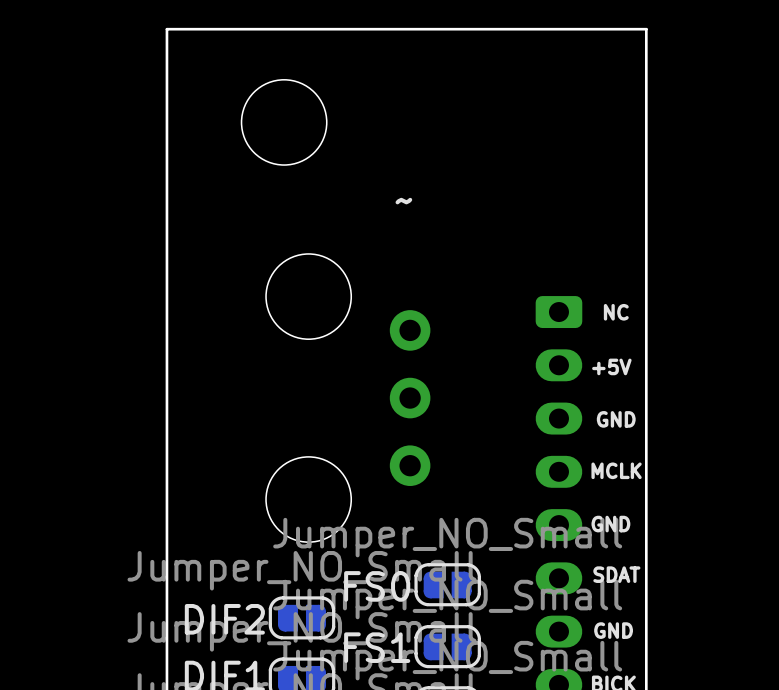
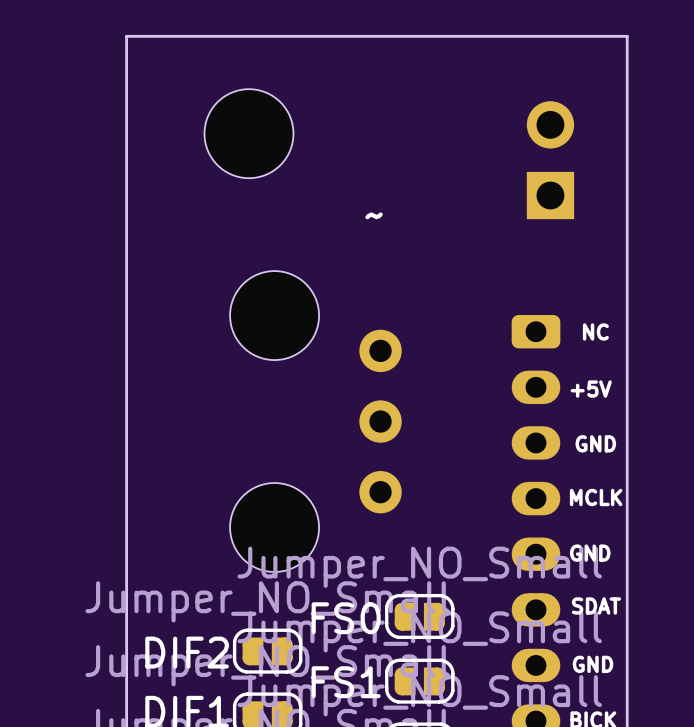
part: none -> (550, 160)

